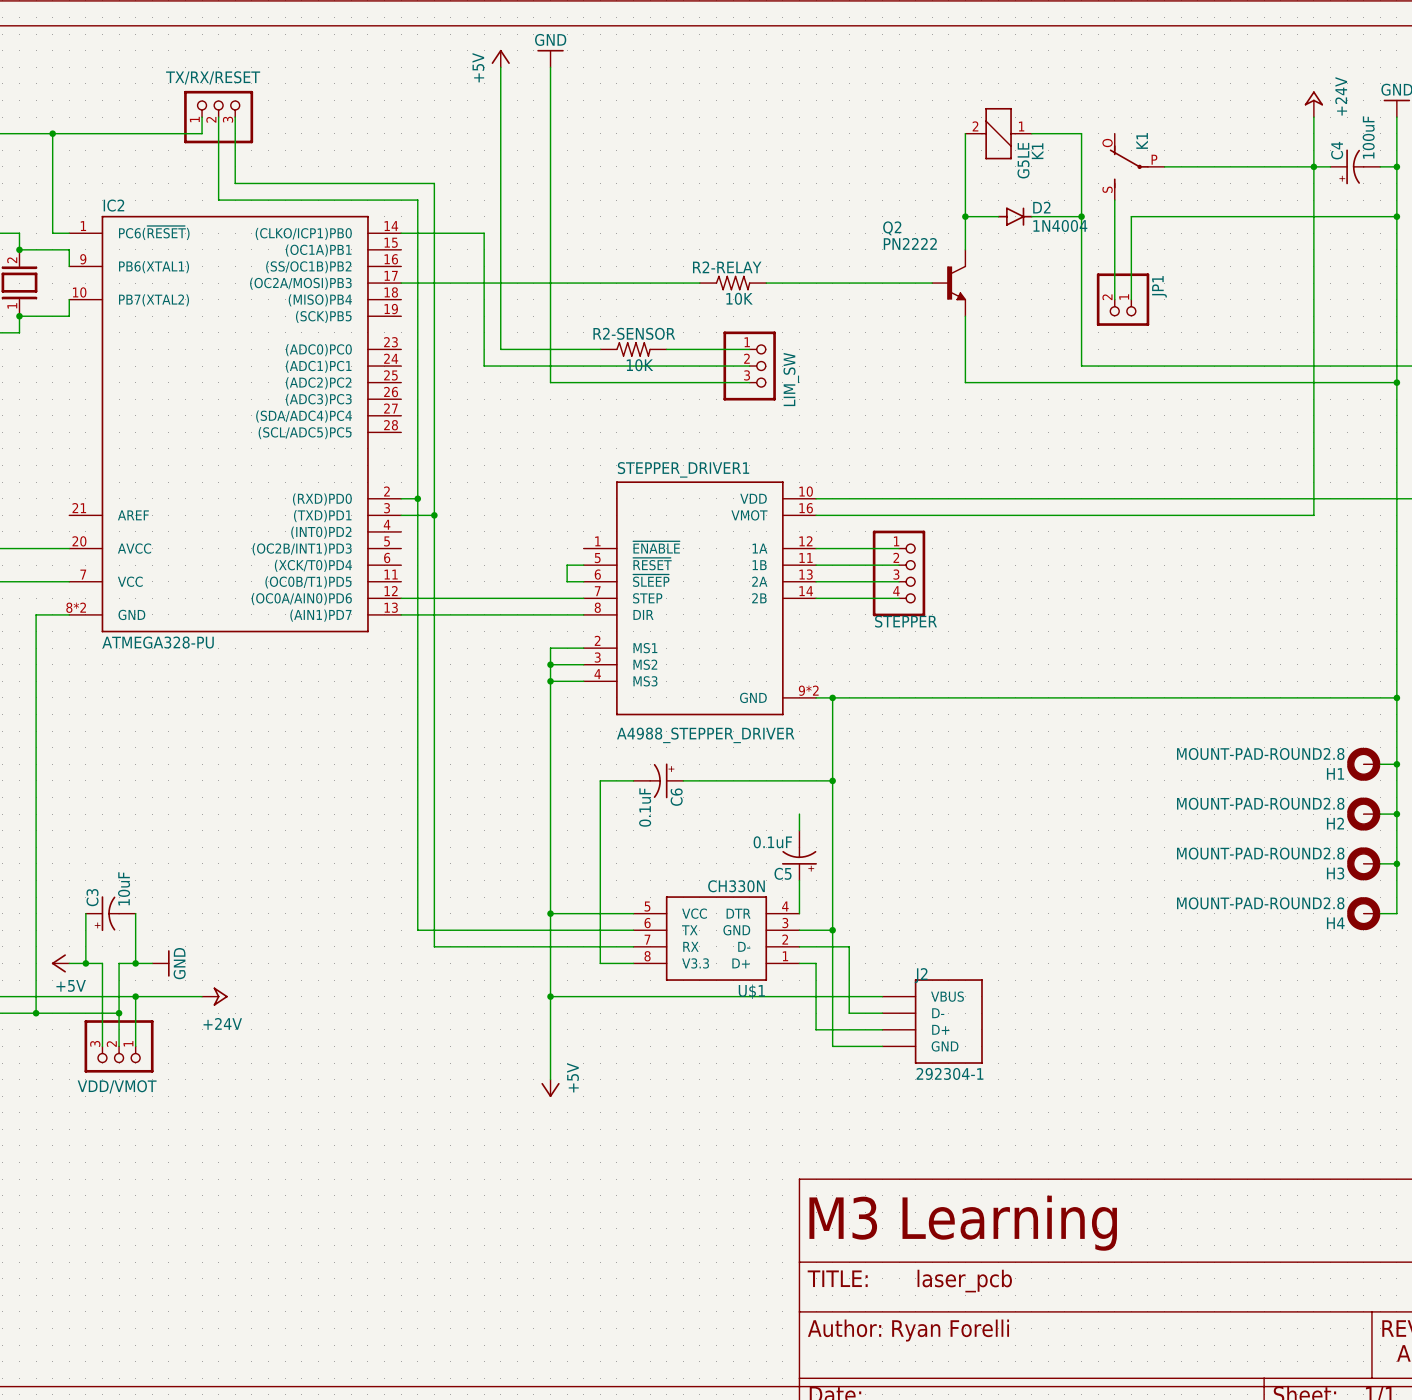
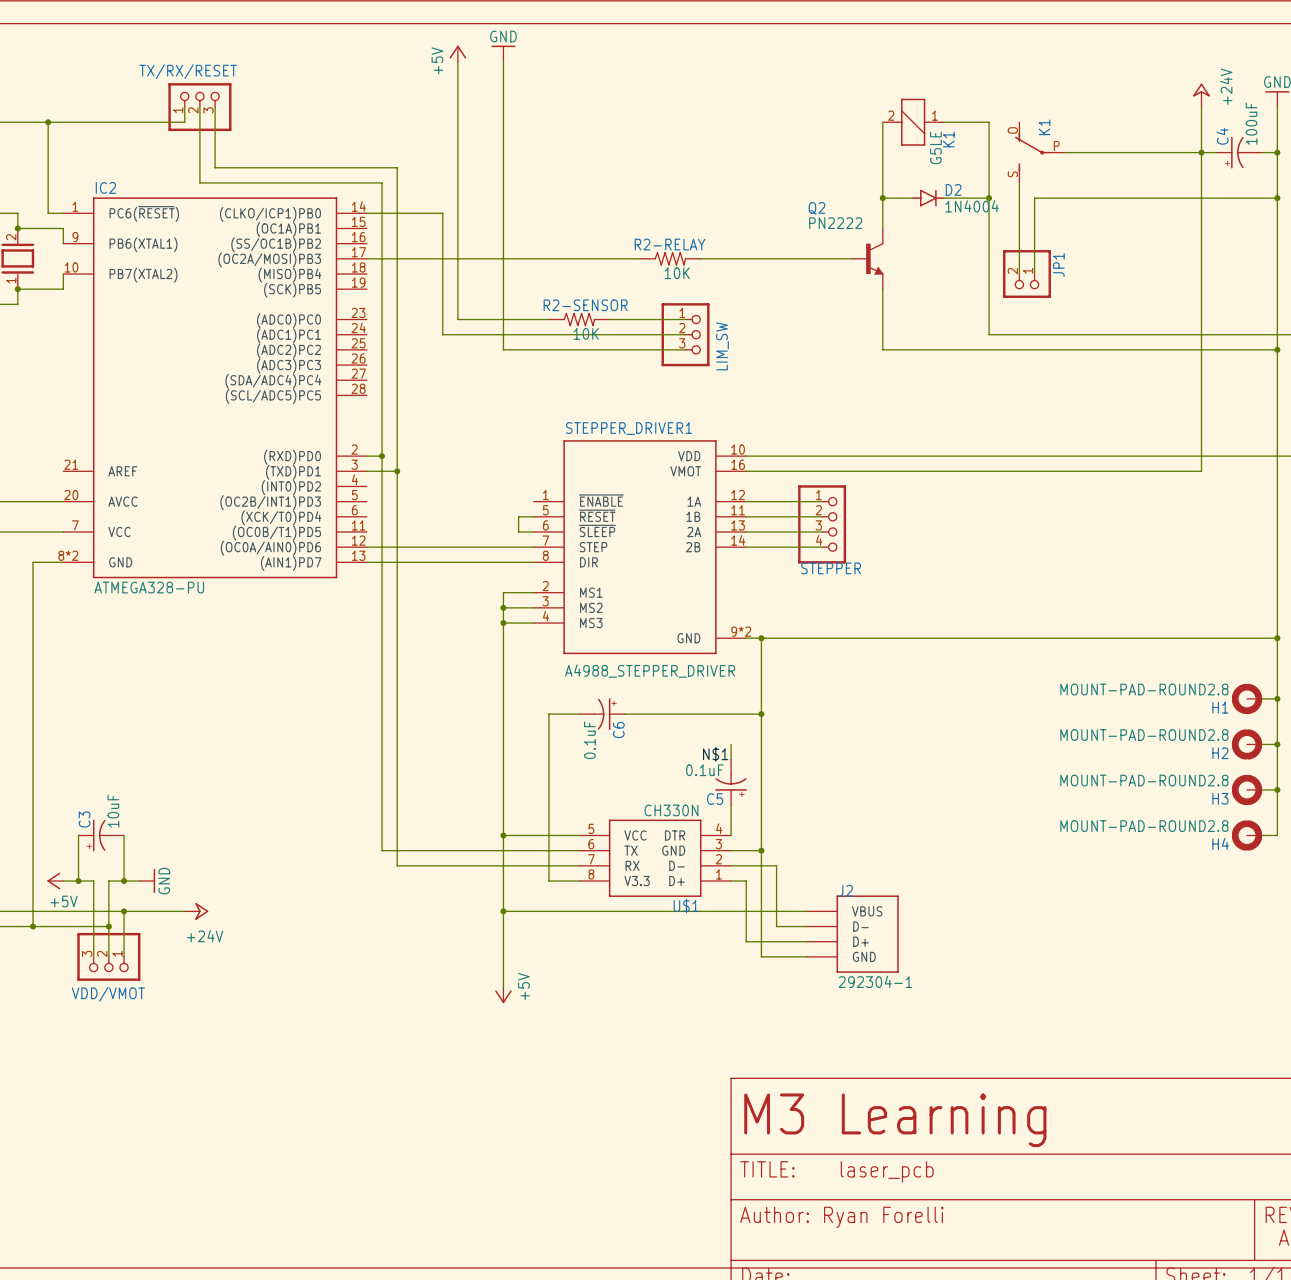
label: none -> N$1 (715, 754)

